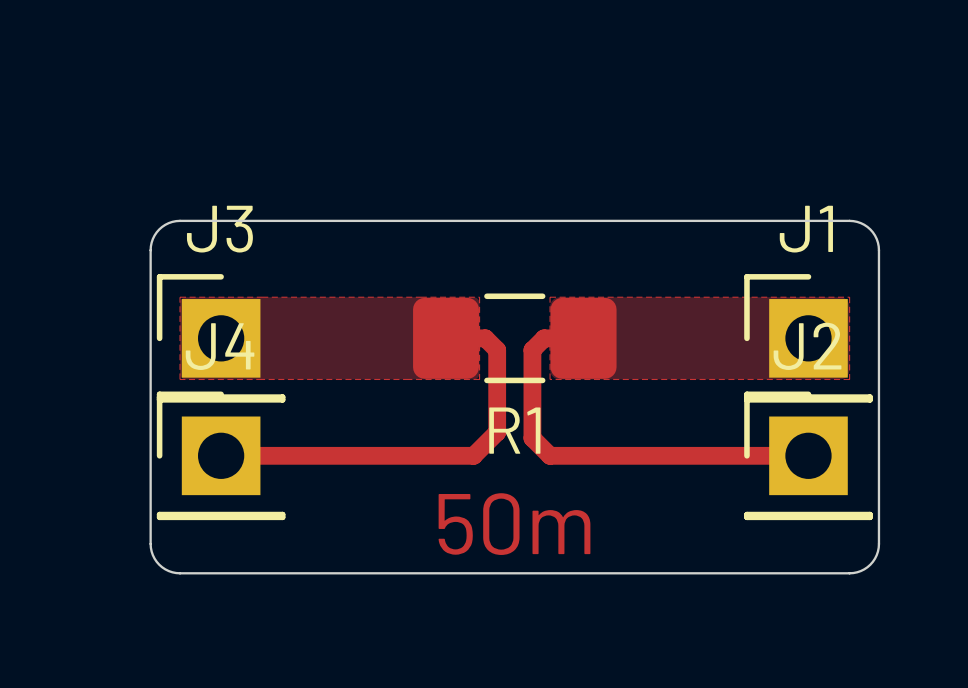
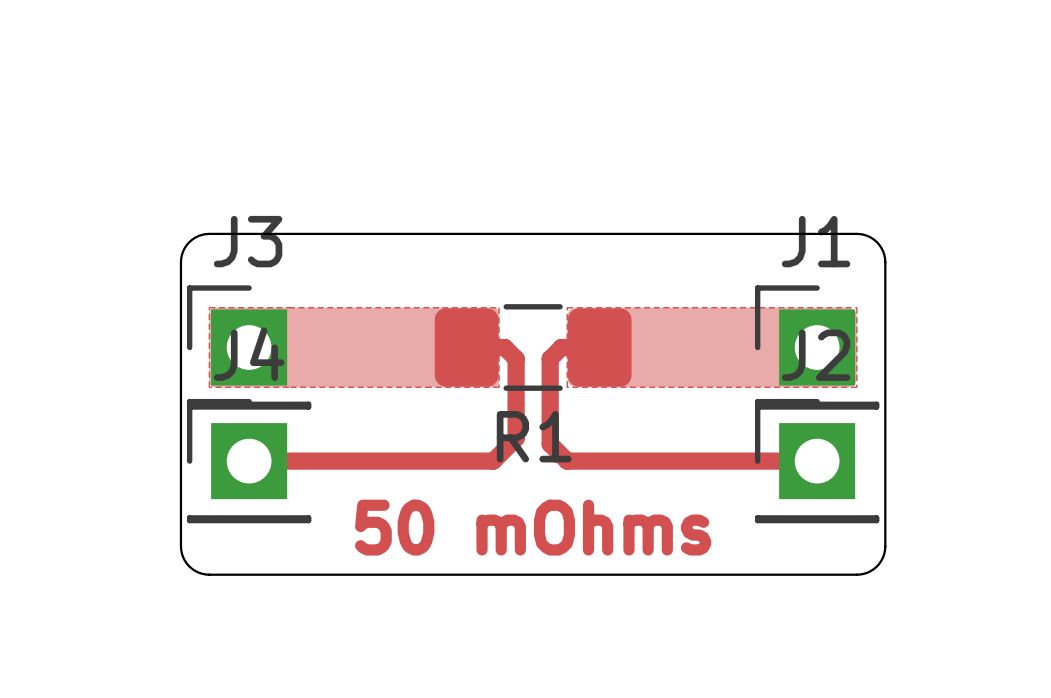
text: 50m (514, 524) -> 50 mOhms (533, 527)

